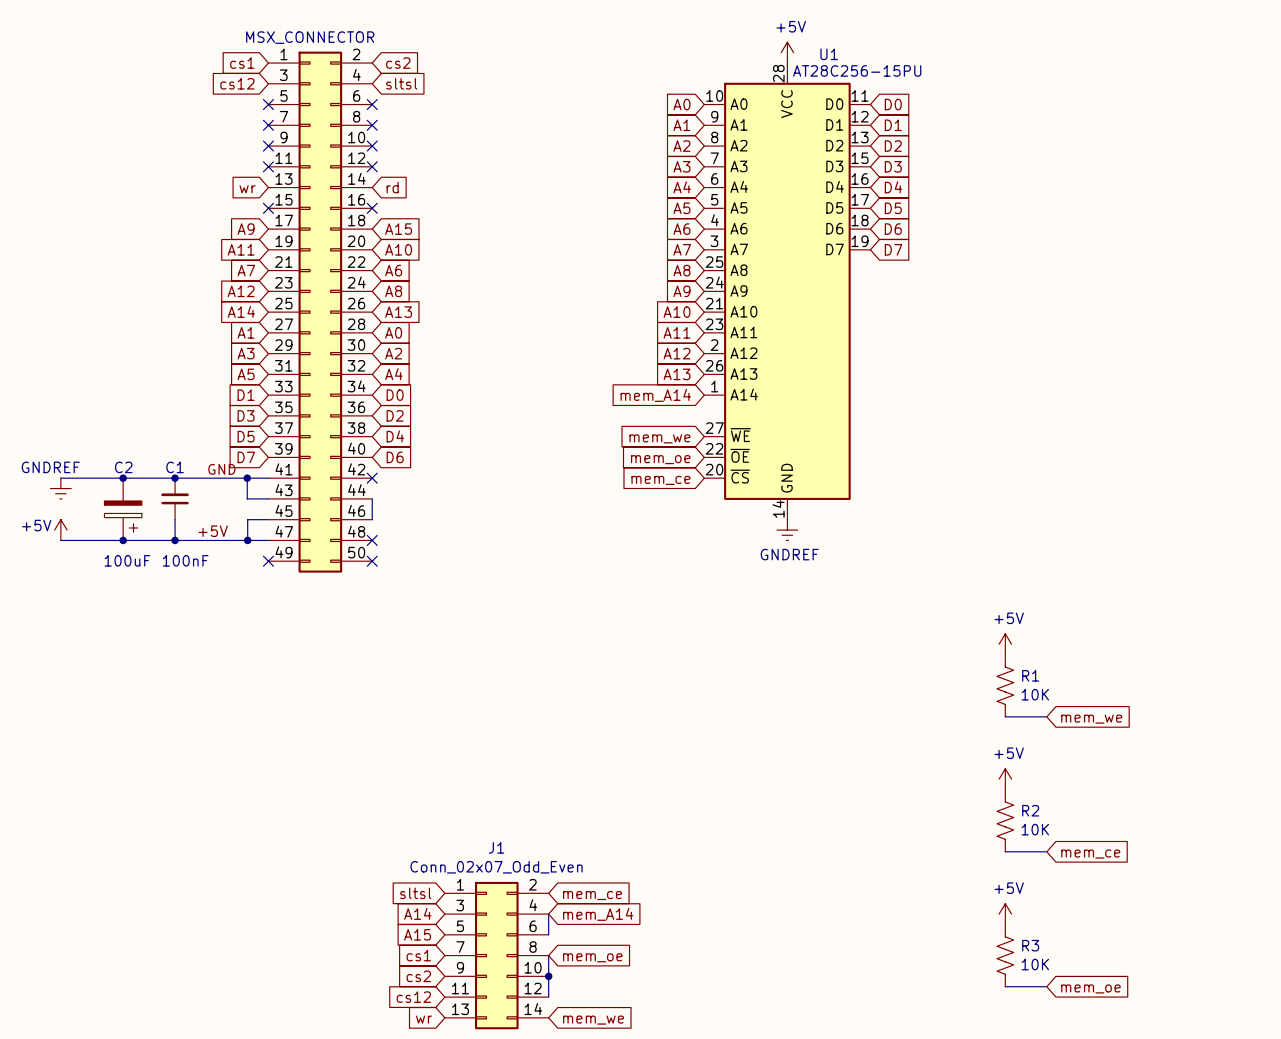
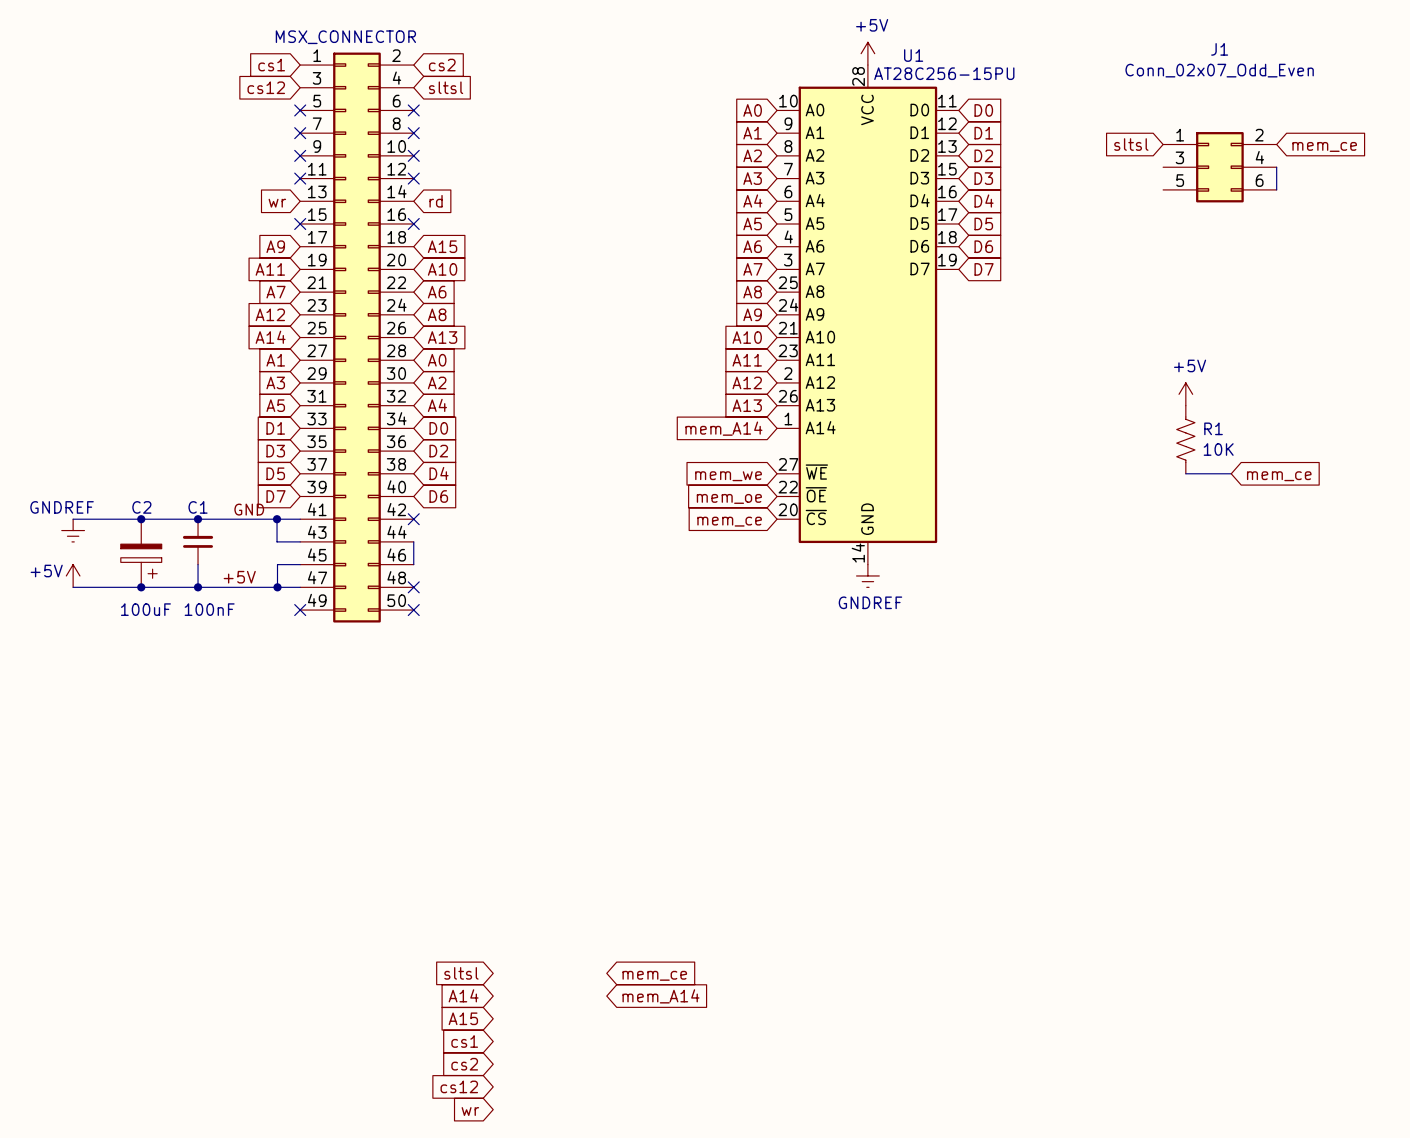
global label: none -> sltsl (1131, 144)
global label: none -> mem_ce (1324, 146)
wire: none -> (1276, 167) (1276, 189)
power symbol: none -> +5V (1185, 394)
wire: none -> (1185, 473) (1231, 473)
global label: none -> mem_ce (1279, 476)
power symbol: +5V (1005, 644) -> none
R1 position: (1005, 685) -> (1185, 439)
wire: (1005, 716) (1046, 716) -> none
global label: mem_we (1091, 719) -> none
power symbol: +5V (1005, 779) -> none
R2: 10K (1005, 820) -> none
wire: (1005, 851) (1046, 851) -> none
global label: mem_ce (1090, 854) -> none
J1 symbol: [444, 881, 549, 1030] -> [1163, 132, 1277, 203]
wire: (548, 914) (548, 934) -> none
power symbol: +5V (1005, 914) -> none
wire: (548, 955) (548, 997) -> none
R3: 10K (1005, 955) -> none
global label: mem_oe (592, 957) -> none
junction: (548, 976) -> none
wire: (1005, 986) (1046, 986) -> none
global label: mem_oe (1090, 988) -> none
global label: mem_we (593, 1020) -> none

